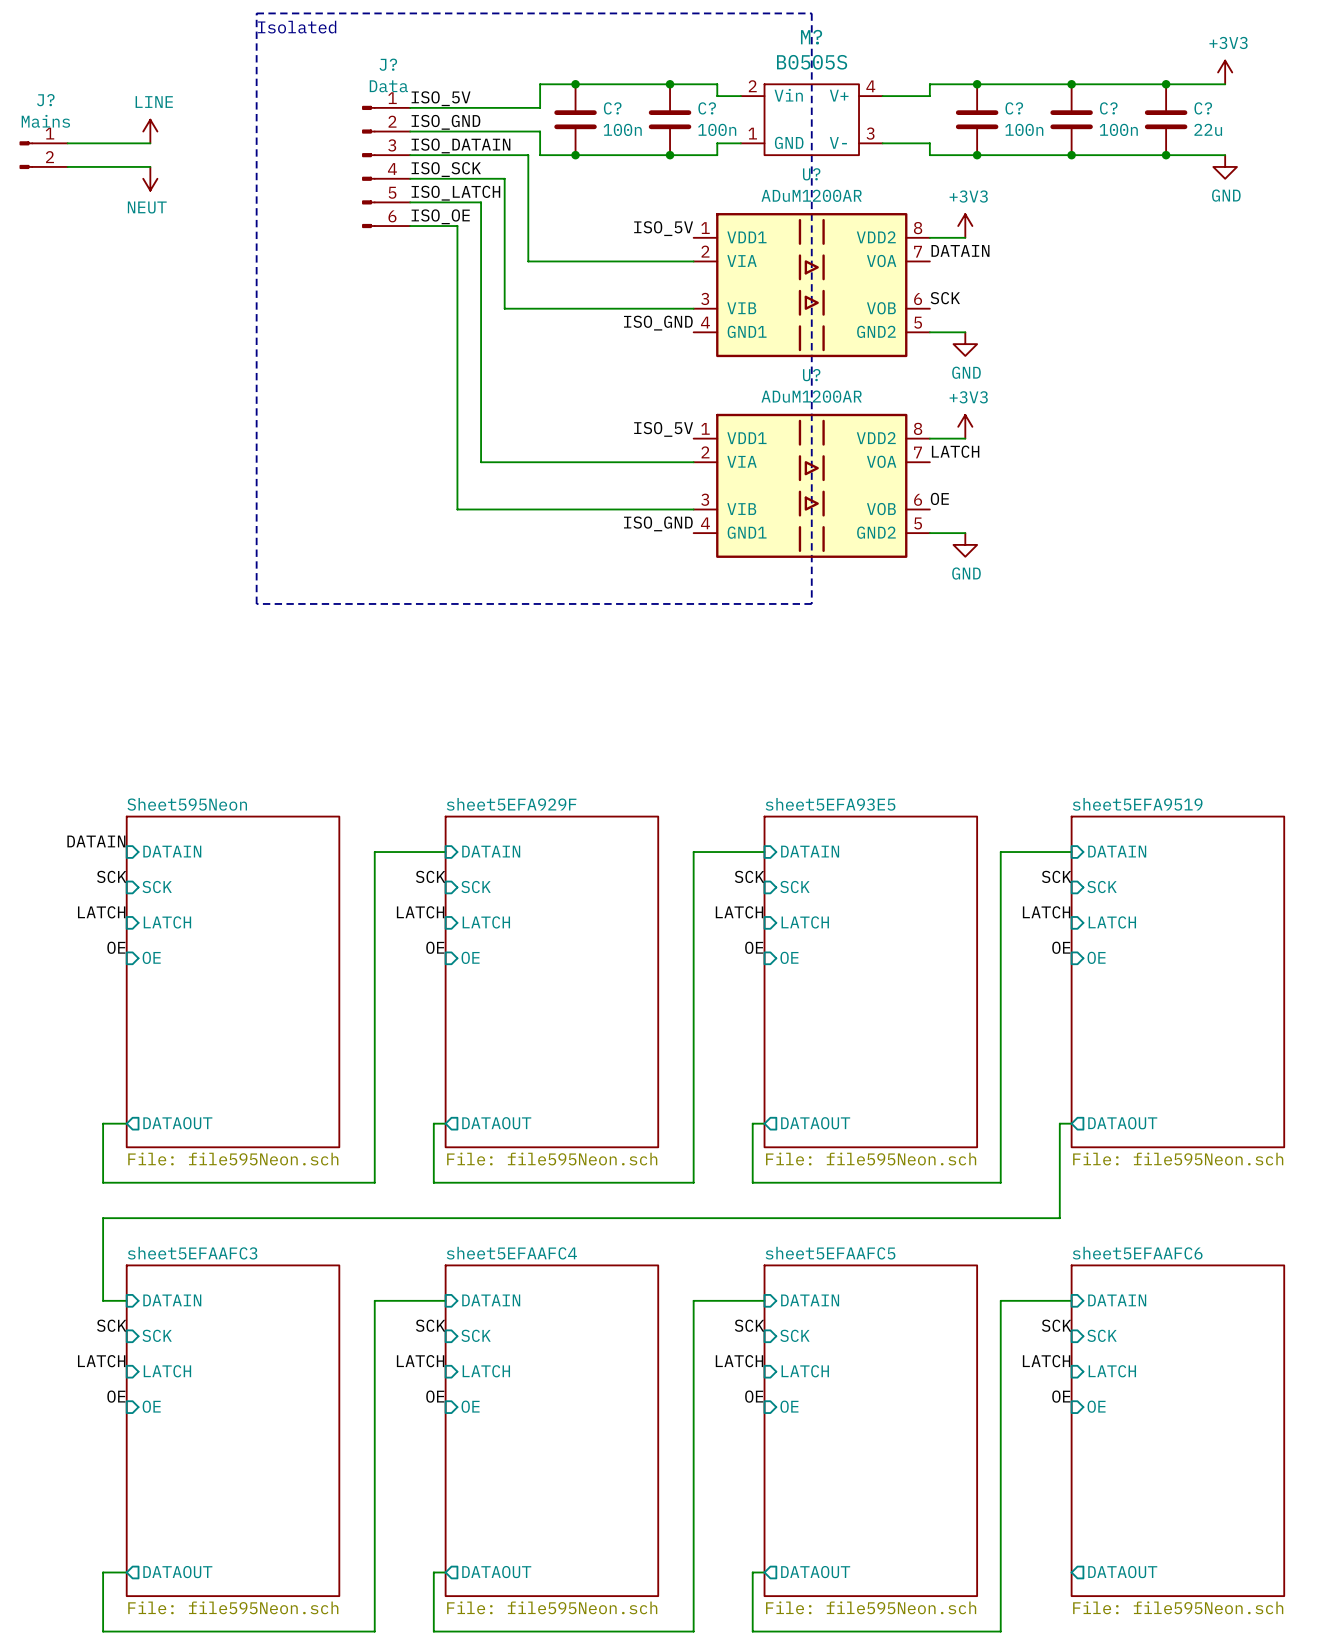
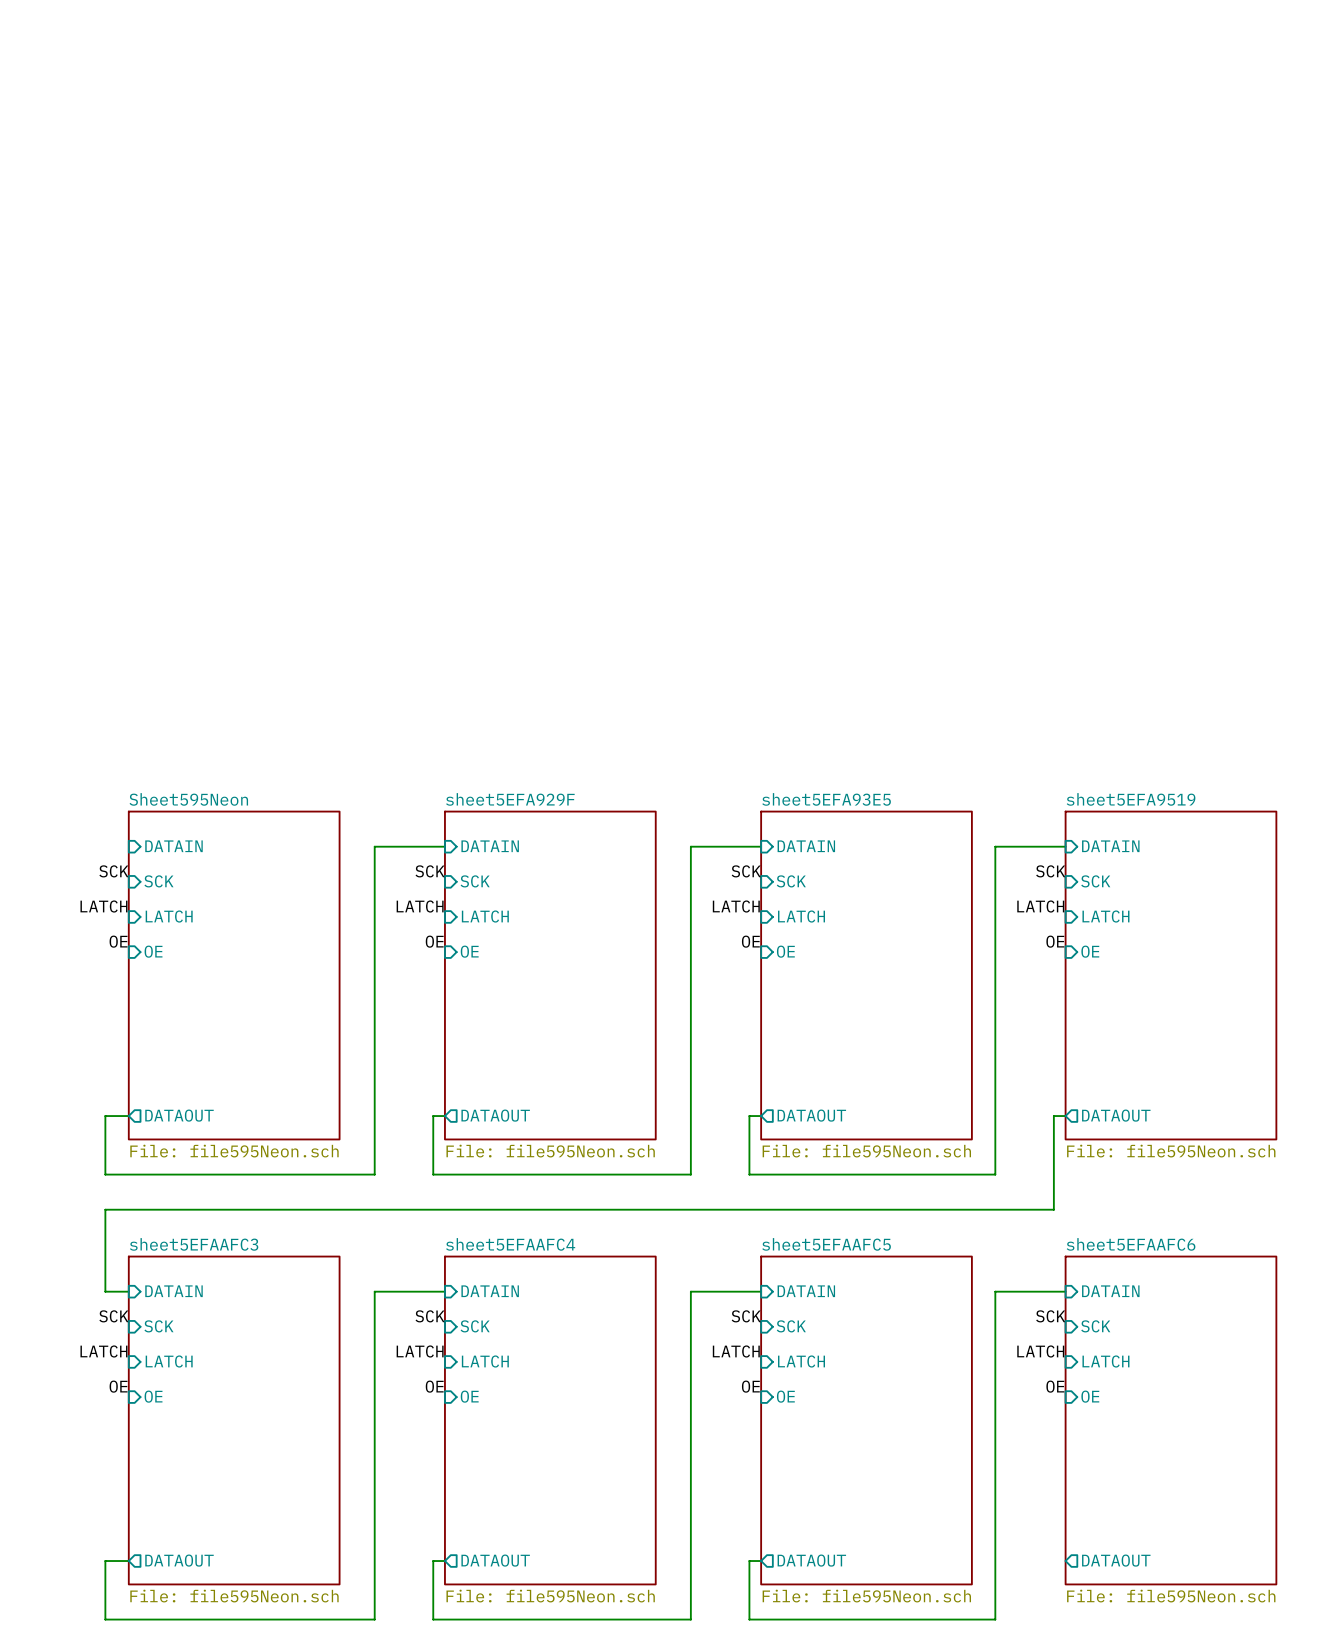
line: (256, 13) (811, 13) (811, 603) (256, 603) (256, 13) -> none
text: Isolated (297, 27) -> none
power symbol: +3V3 (1225, 72) -> none
junction: (575, 84) -> none
junction: (670, 84) -> none
junction: (977, 84) -> none
junction: (1071, 84) -> none
junction: (1166, 84) -> none
wire: (1225, 84) (929, 84) (929, 96) (882, 96) -> none
wire: (740, 96) (717, 96) (717, 84) (540, 84) (540, 107) (410, 107) -> none
label: ISO_5V (441, 98) -> none
C?: 100n (575, 119) -> none
C?: 100n (670, 119) -> none
M?: B0505S (811, 119) -> none
C?: 100n (977, 119) -> none
C?: 100n (1071, 119) -> none
C?: 22u (1166, 119) -> none
label: ISO_GND (445, 122) -> none
power symbol: LINE (150, 131) -> none
wire: (410, 131) (540, 131) (540, 155) (717, 155) (717, 143) (740, 143) -> none
wire: (67, 143) (150, 143) -> none
wire: (882, 143) (929, 143) (929, 155) (1225, 155) -> none
label: ISO_DATAIN (460, 145) -> none
J?: Mains (43, 155) -> none
wire: (410, 155) (528, 155) (528, 261) (693, 261) -> none
junction: (575, 155) -> none
junction: (670, 155) -> none
junction: (977, 155) -> none
junction: (1071, 155) -> none
junction: (1166, 155) -> none
wire: (67, 166) (150, 166) -> none
J?: Data (386, 166) -> none
power symbol: GND (1225, 166) -> none
label: ISO_SCK (446, 169) -> none
power symbol: NEUT (150, 178) -> none
wire: (410, 178) (504, 178) (504, 308) (693, 308) -> none
label: ISO_LATCH (455, 193) -> none
wire: (410, 202) (481, 202) (481, 462) (693, 462) -> none
label: ISO_OE (440, 216) -> none
wire: (410, 226) (457, 226) (457, 509) (693, 509) -> none
power symbol: +3V3 (965, 226) -> none
label: ISO_5V (663, 228) -> none
wire: (929, 237) (965, 237) -> none
label: DATAIN (960, 250) -> none
U?: ADuM1200AR (811, 285) -> none
label: SCK (945, 298) -> none
label: ISO_GND (658, 323) -> none
wire: (929, 332) (965, 332) -> none
power symbol: GND (965, 344) -> none
power symbol: +3V3 (965, 426) -> none
label: ISO_5V (663, 429) -> none
wire: (929, 438) (965, 438) -> none
label: LATCH (955, 451) -> none
U?: ADuM1200AR (811, 485) -> none
label: OE (939, 498) -> none
label: ISO_GND (658, 523) -> none
wire: (929, 533) (965, 533) -> none
power symbol: GND (965, 544) -> none
label: DATAIN (96, 841) -> none

